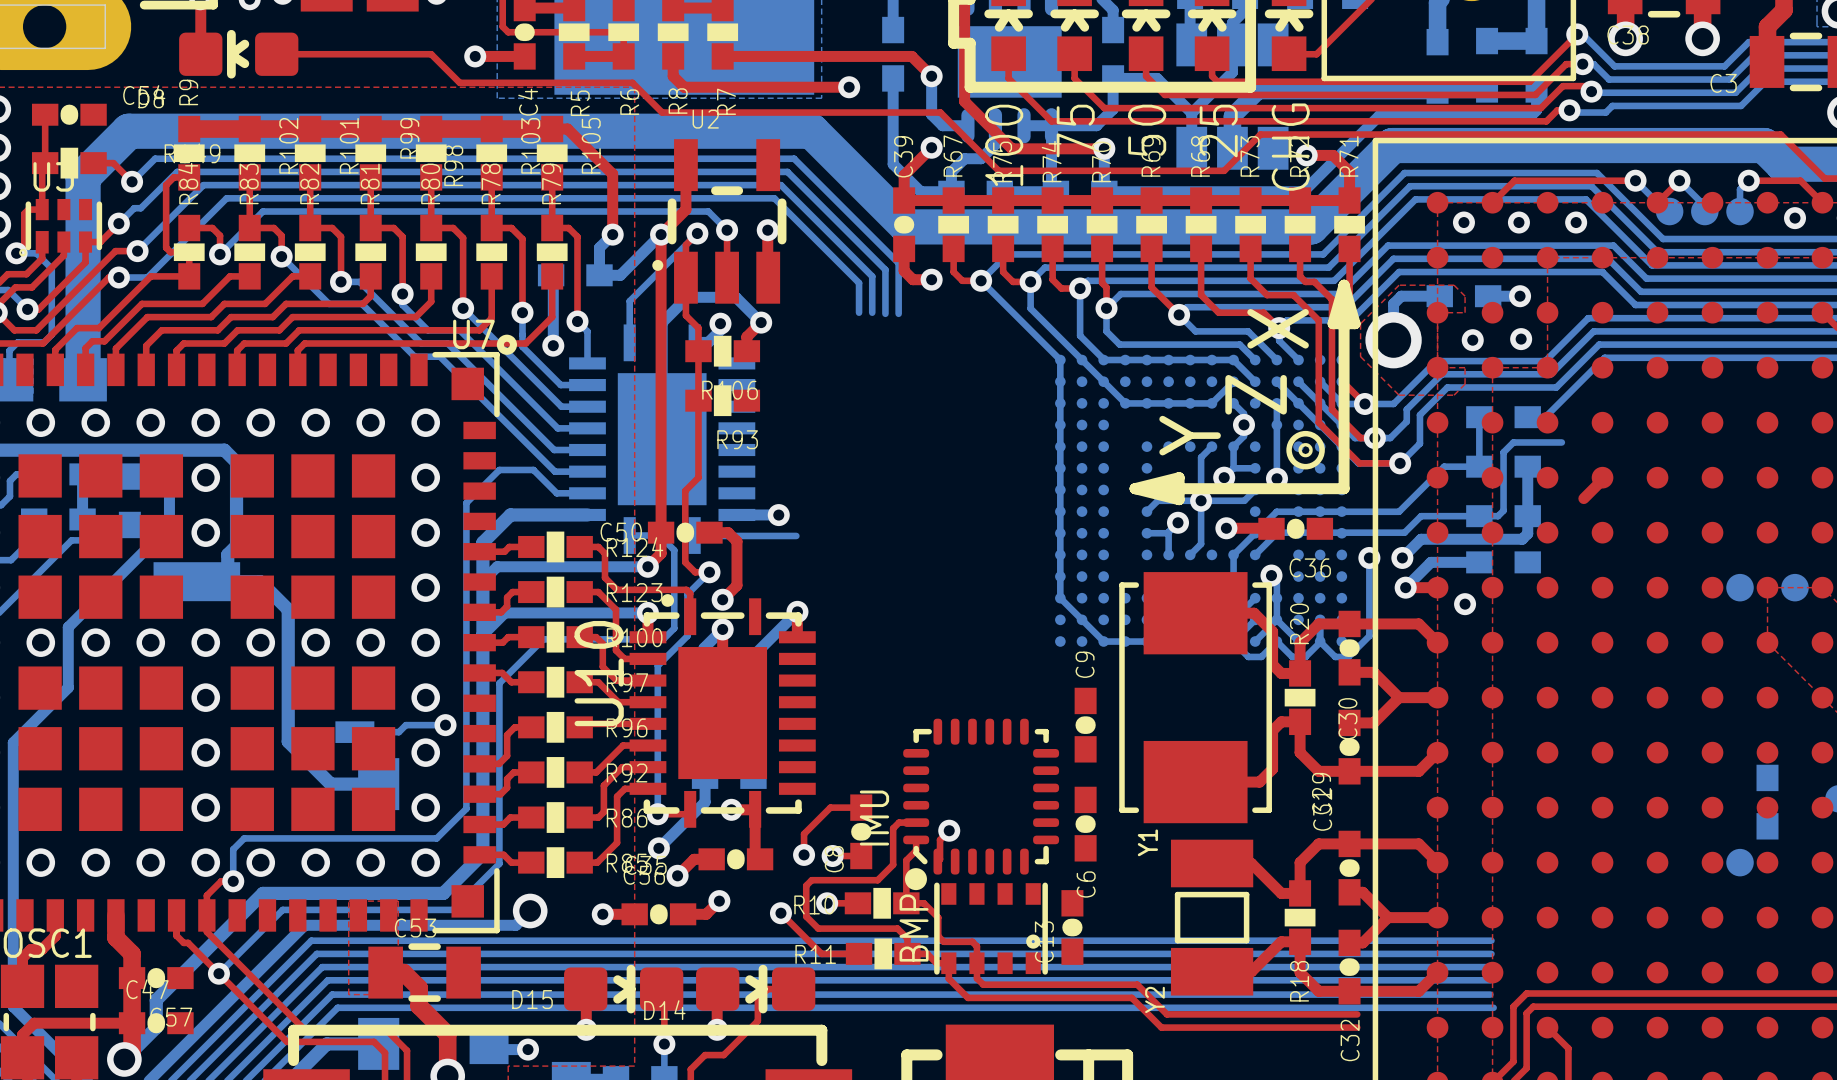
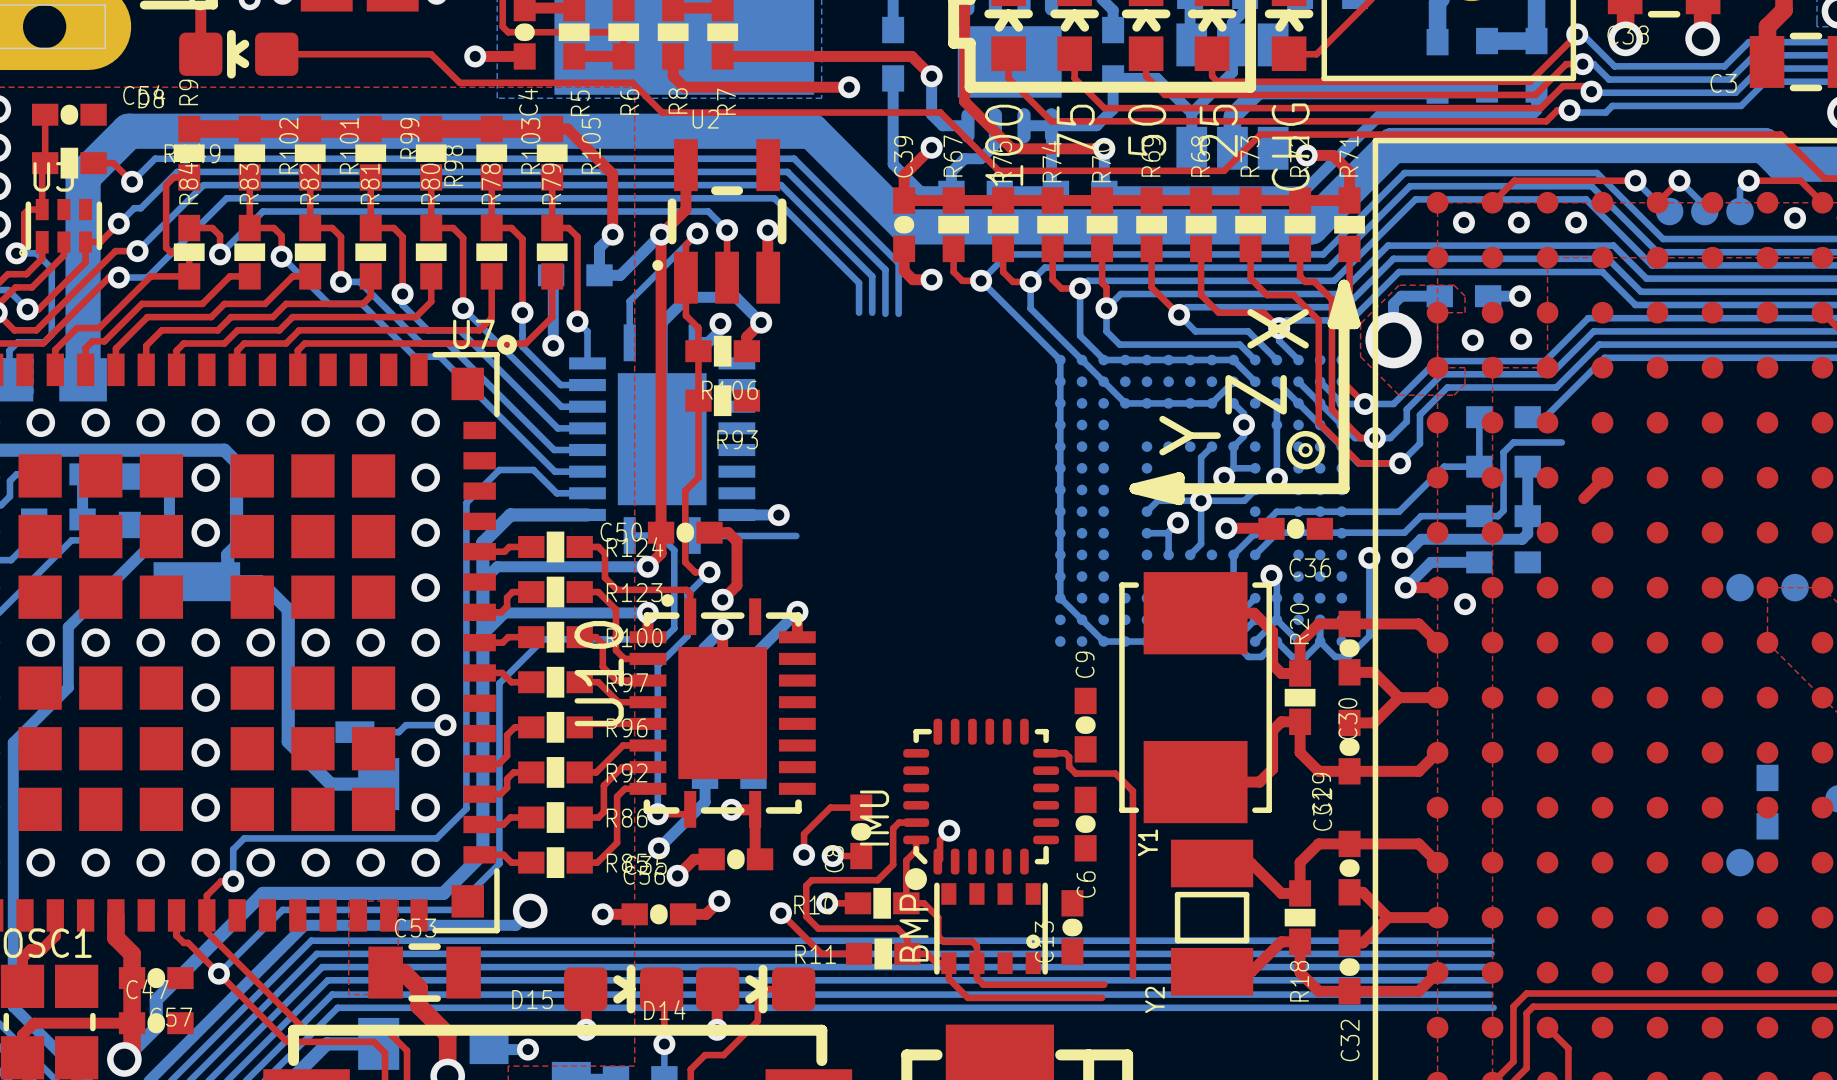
top track: none -> (1046, 753) (1065, 753) (1069, 757) (1069, 766) (1075, 773) (1115, 773) (1132, 791) (1132, 975)
top track: (1104, 984) (1137, 984) (1167, 1014) (1357, 1014) -> none
top track: (1102, 997) (1131, 997) (1161, 1027) (1357, 1027) -> none

